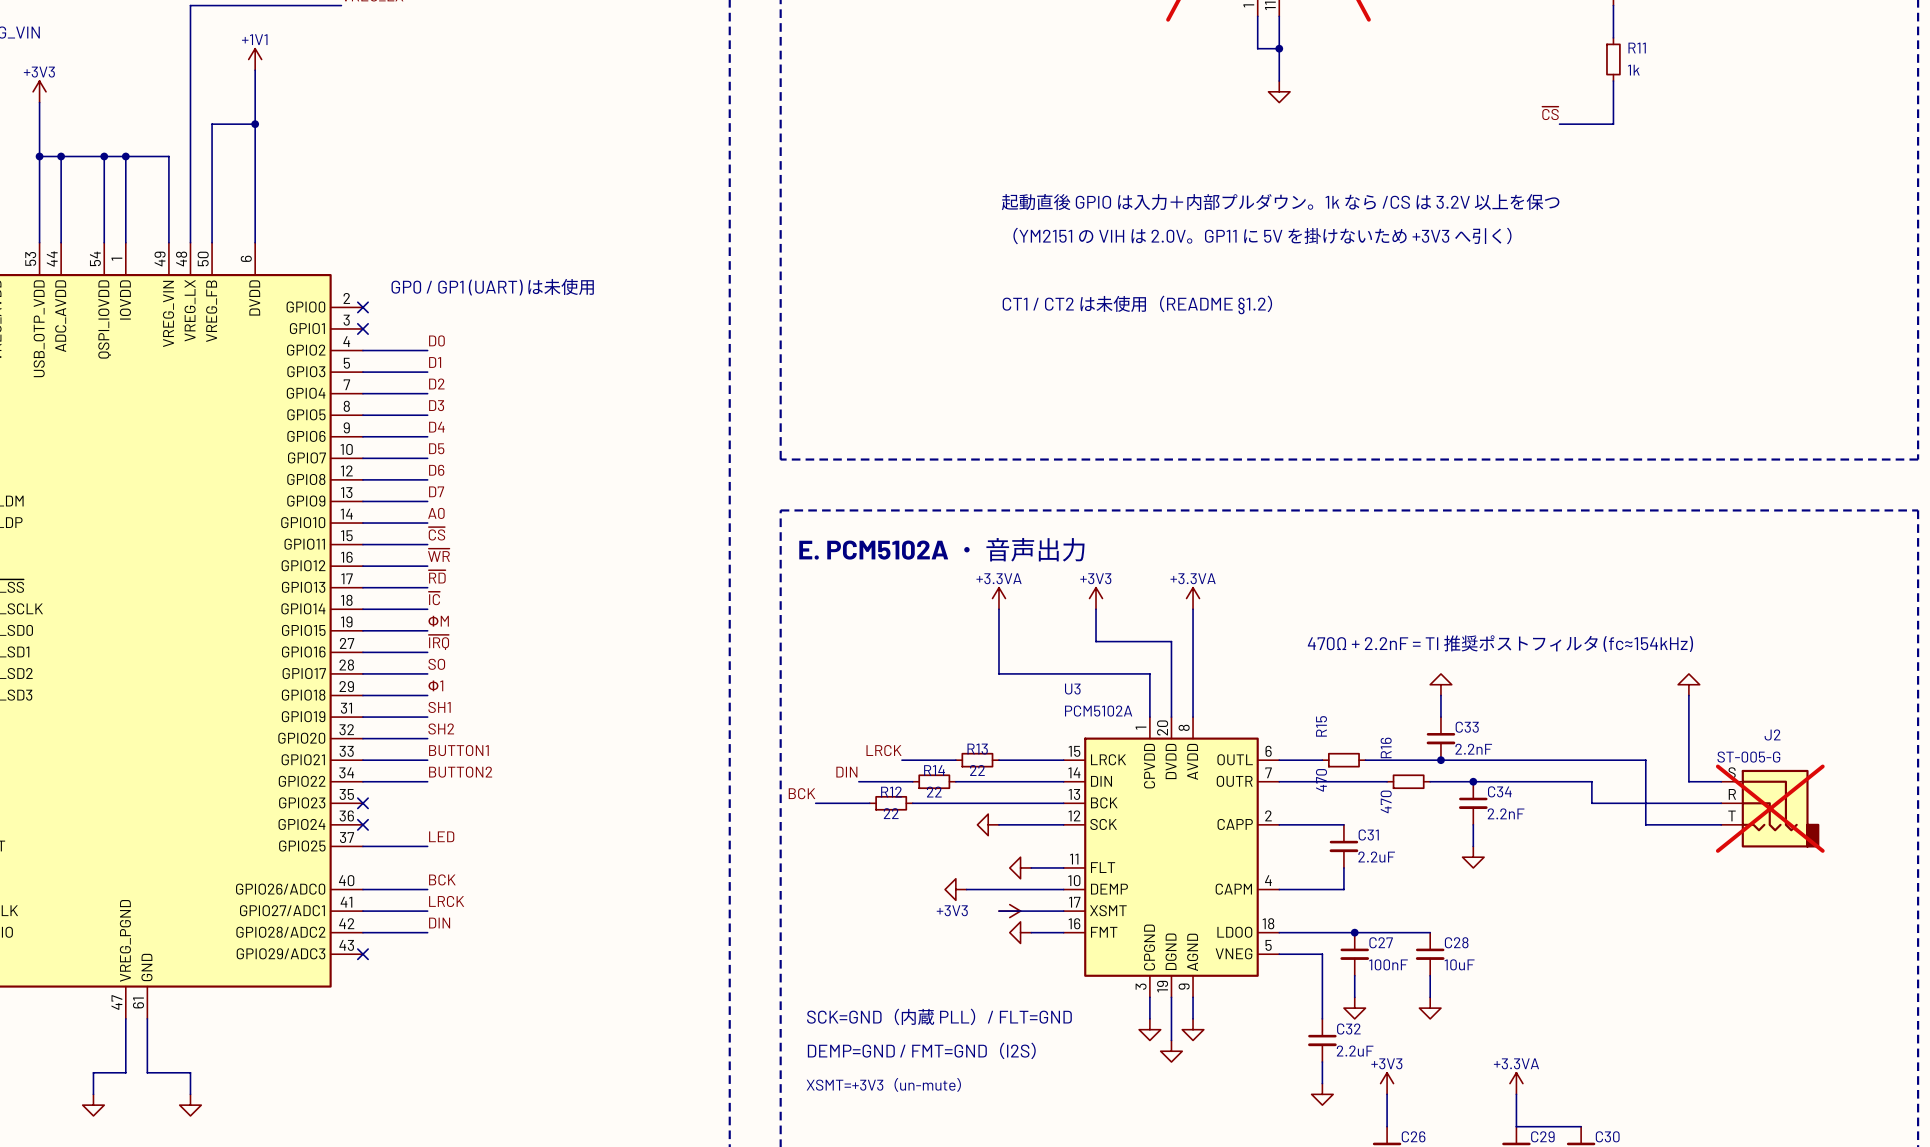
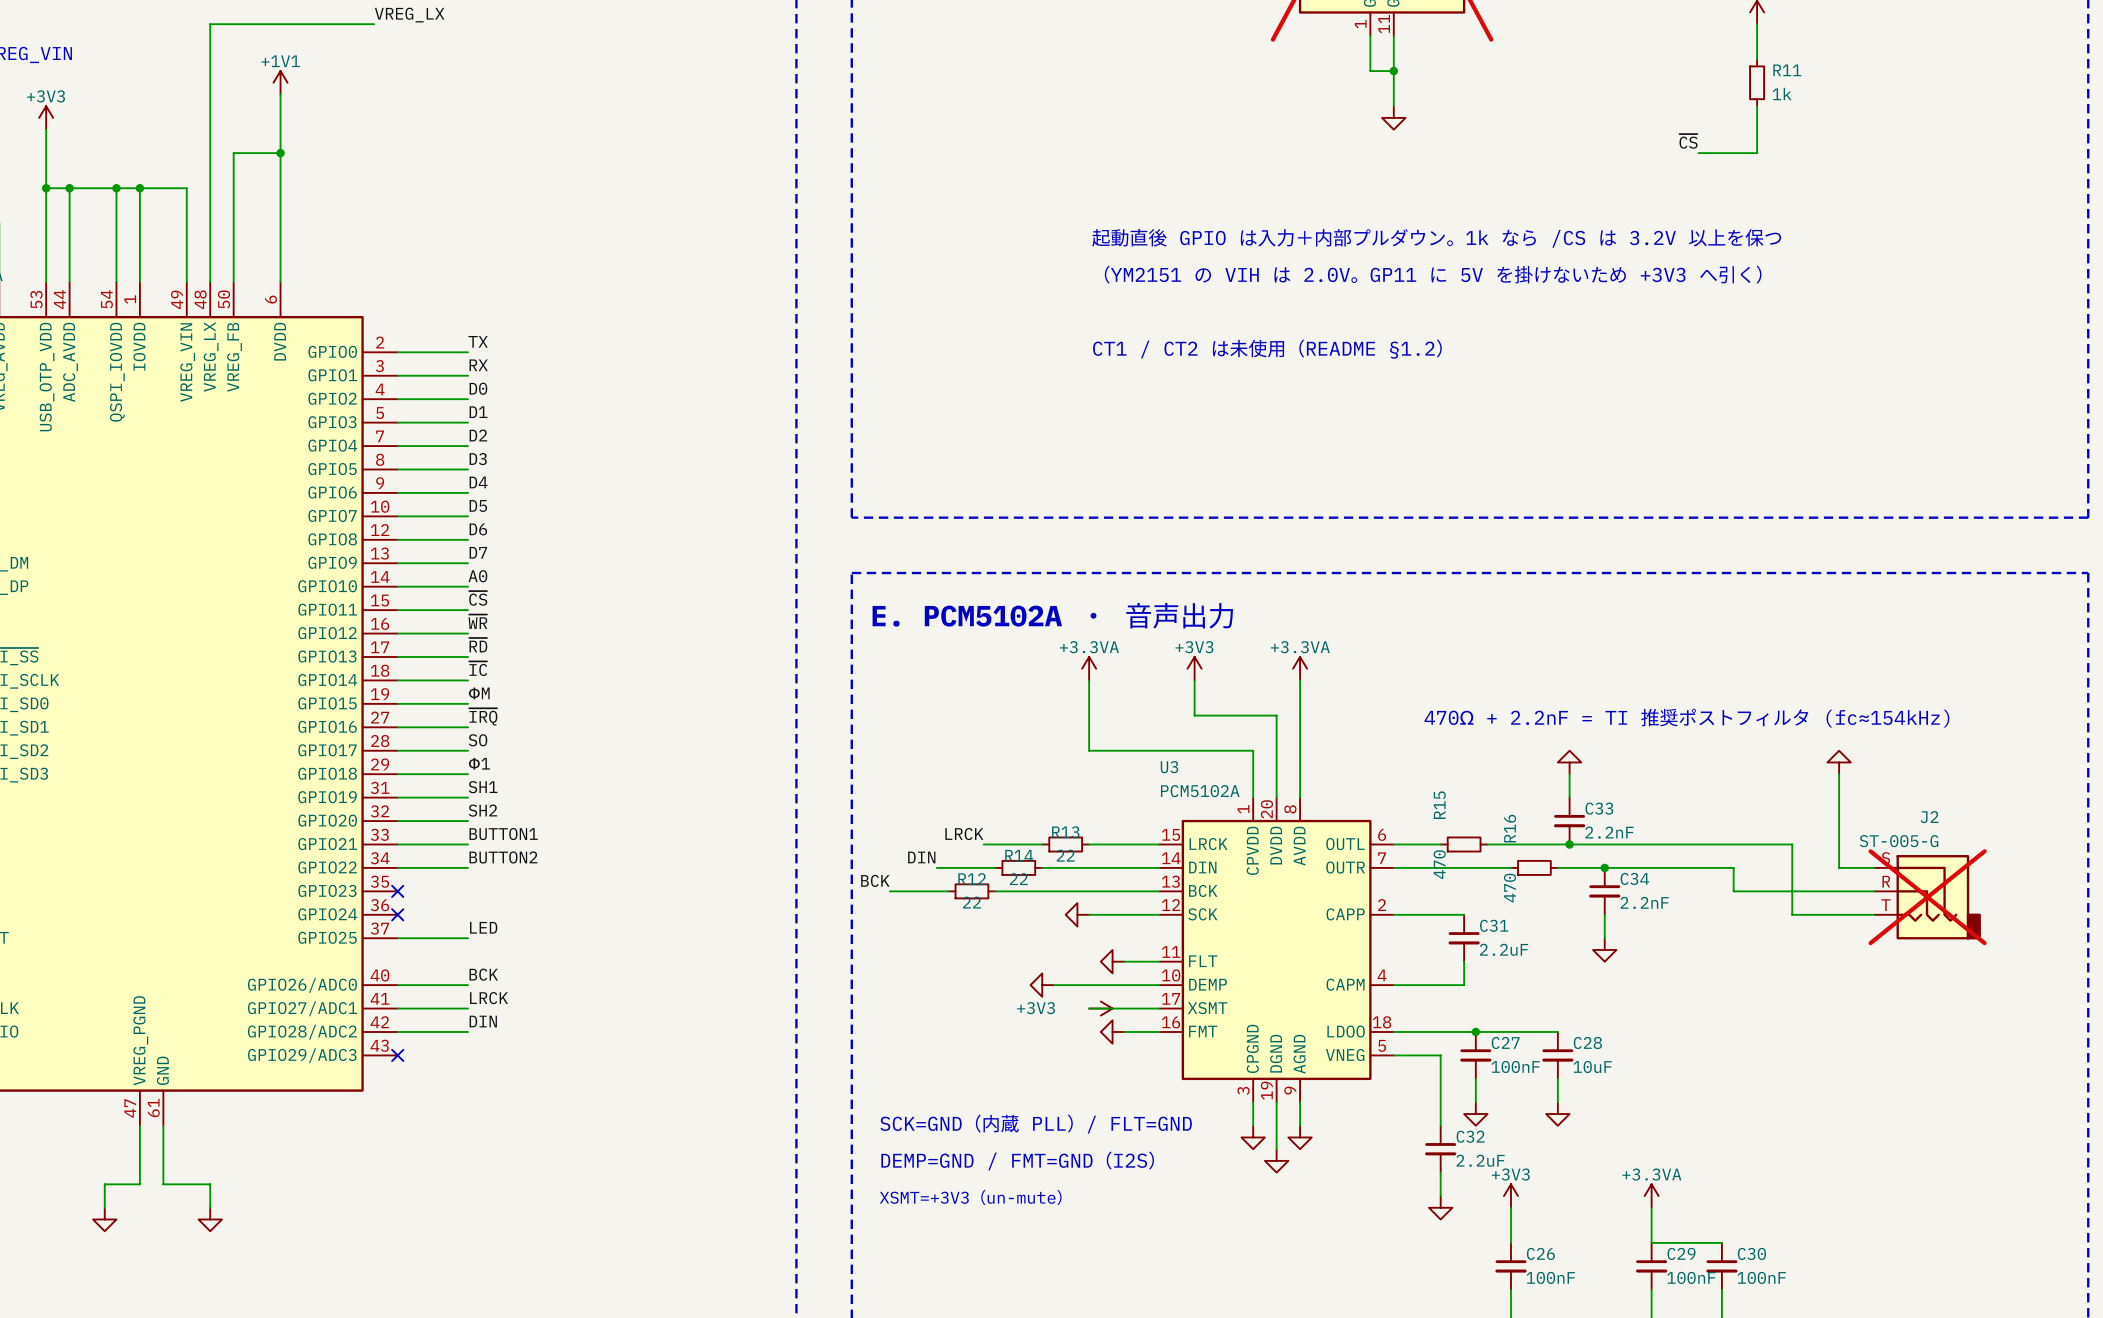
text: GP0 / GP1 (UART) は未使用 (492, 287) -> none
label: none -> TX (478, 341)
wire: none -> (397, 352) (468, 352)
no-connect mark: (362, 307) -> none
label: none -> RX (478, 365)
wire: none -> (397, 375) (468, 375)
no-connect mark: (362, 328) -> none

